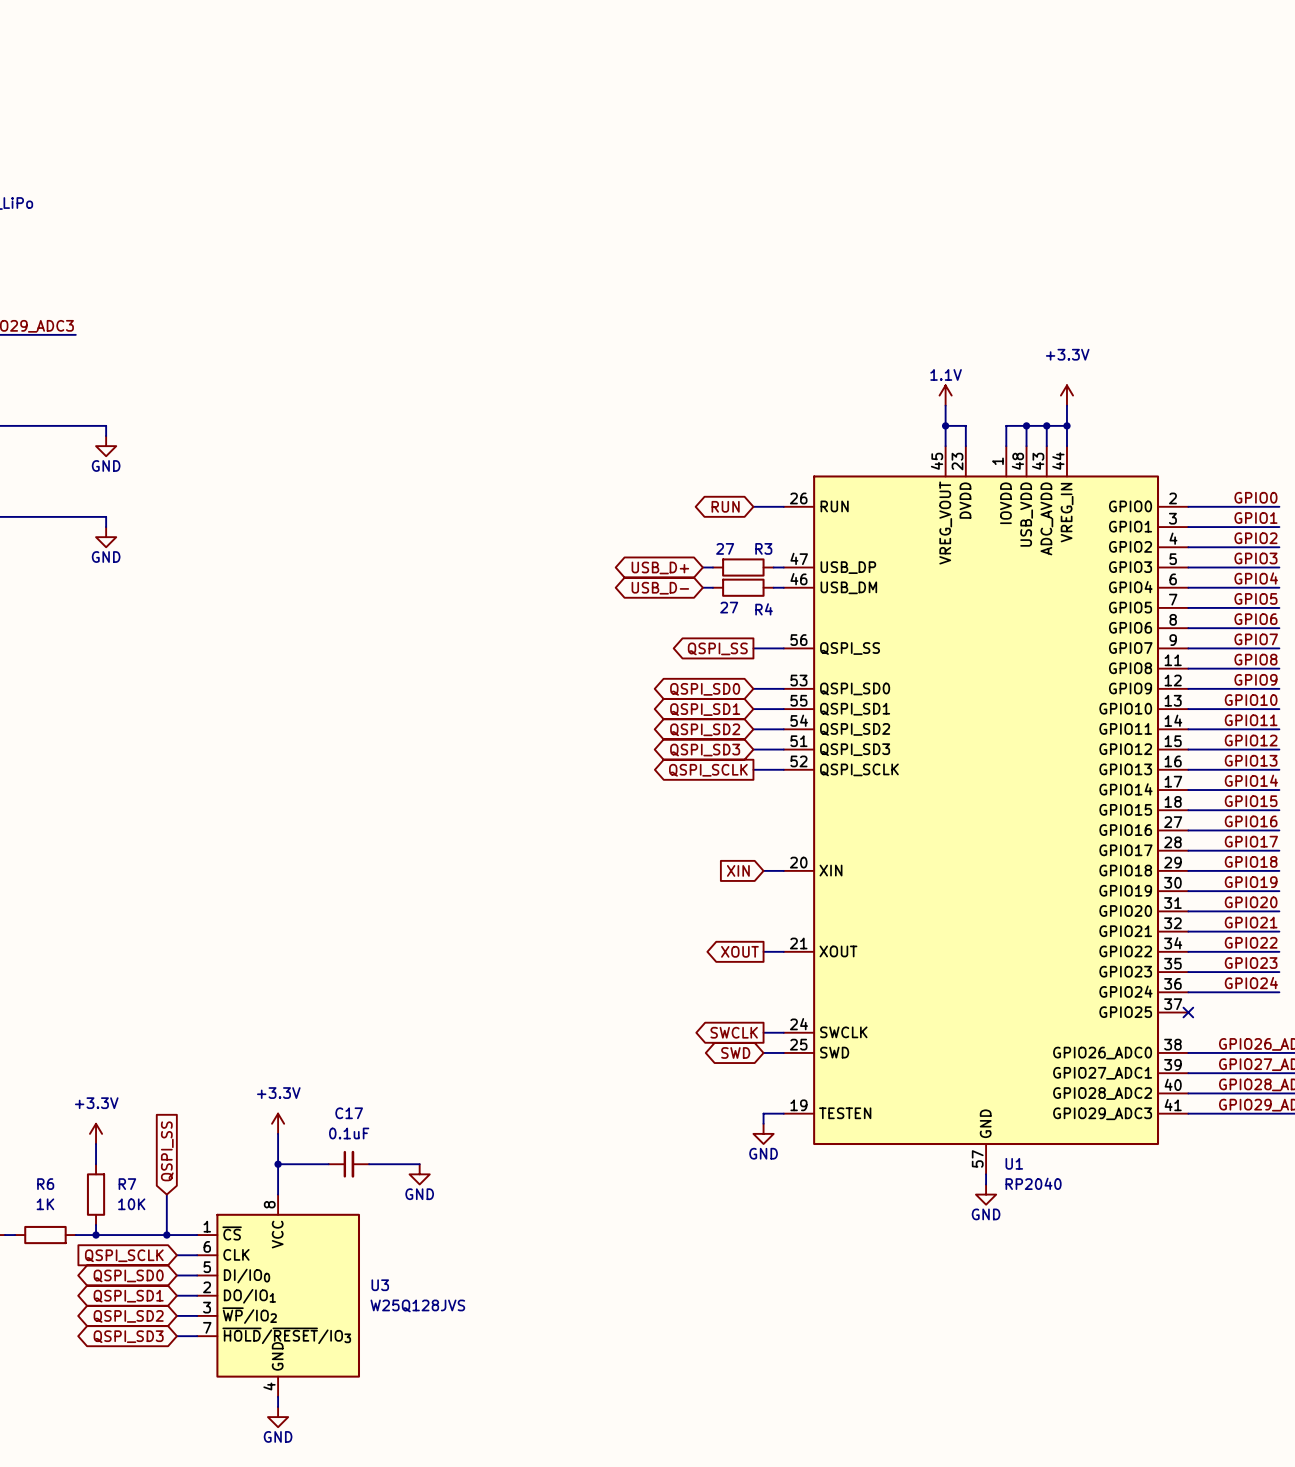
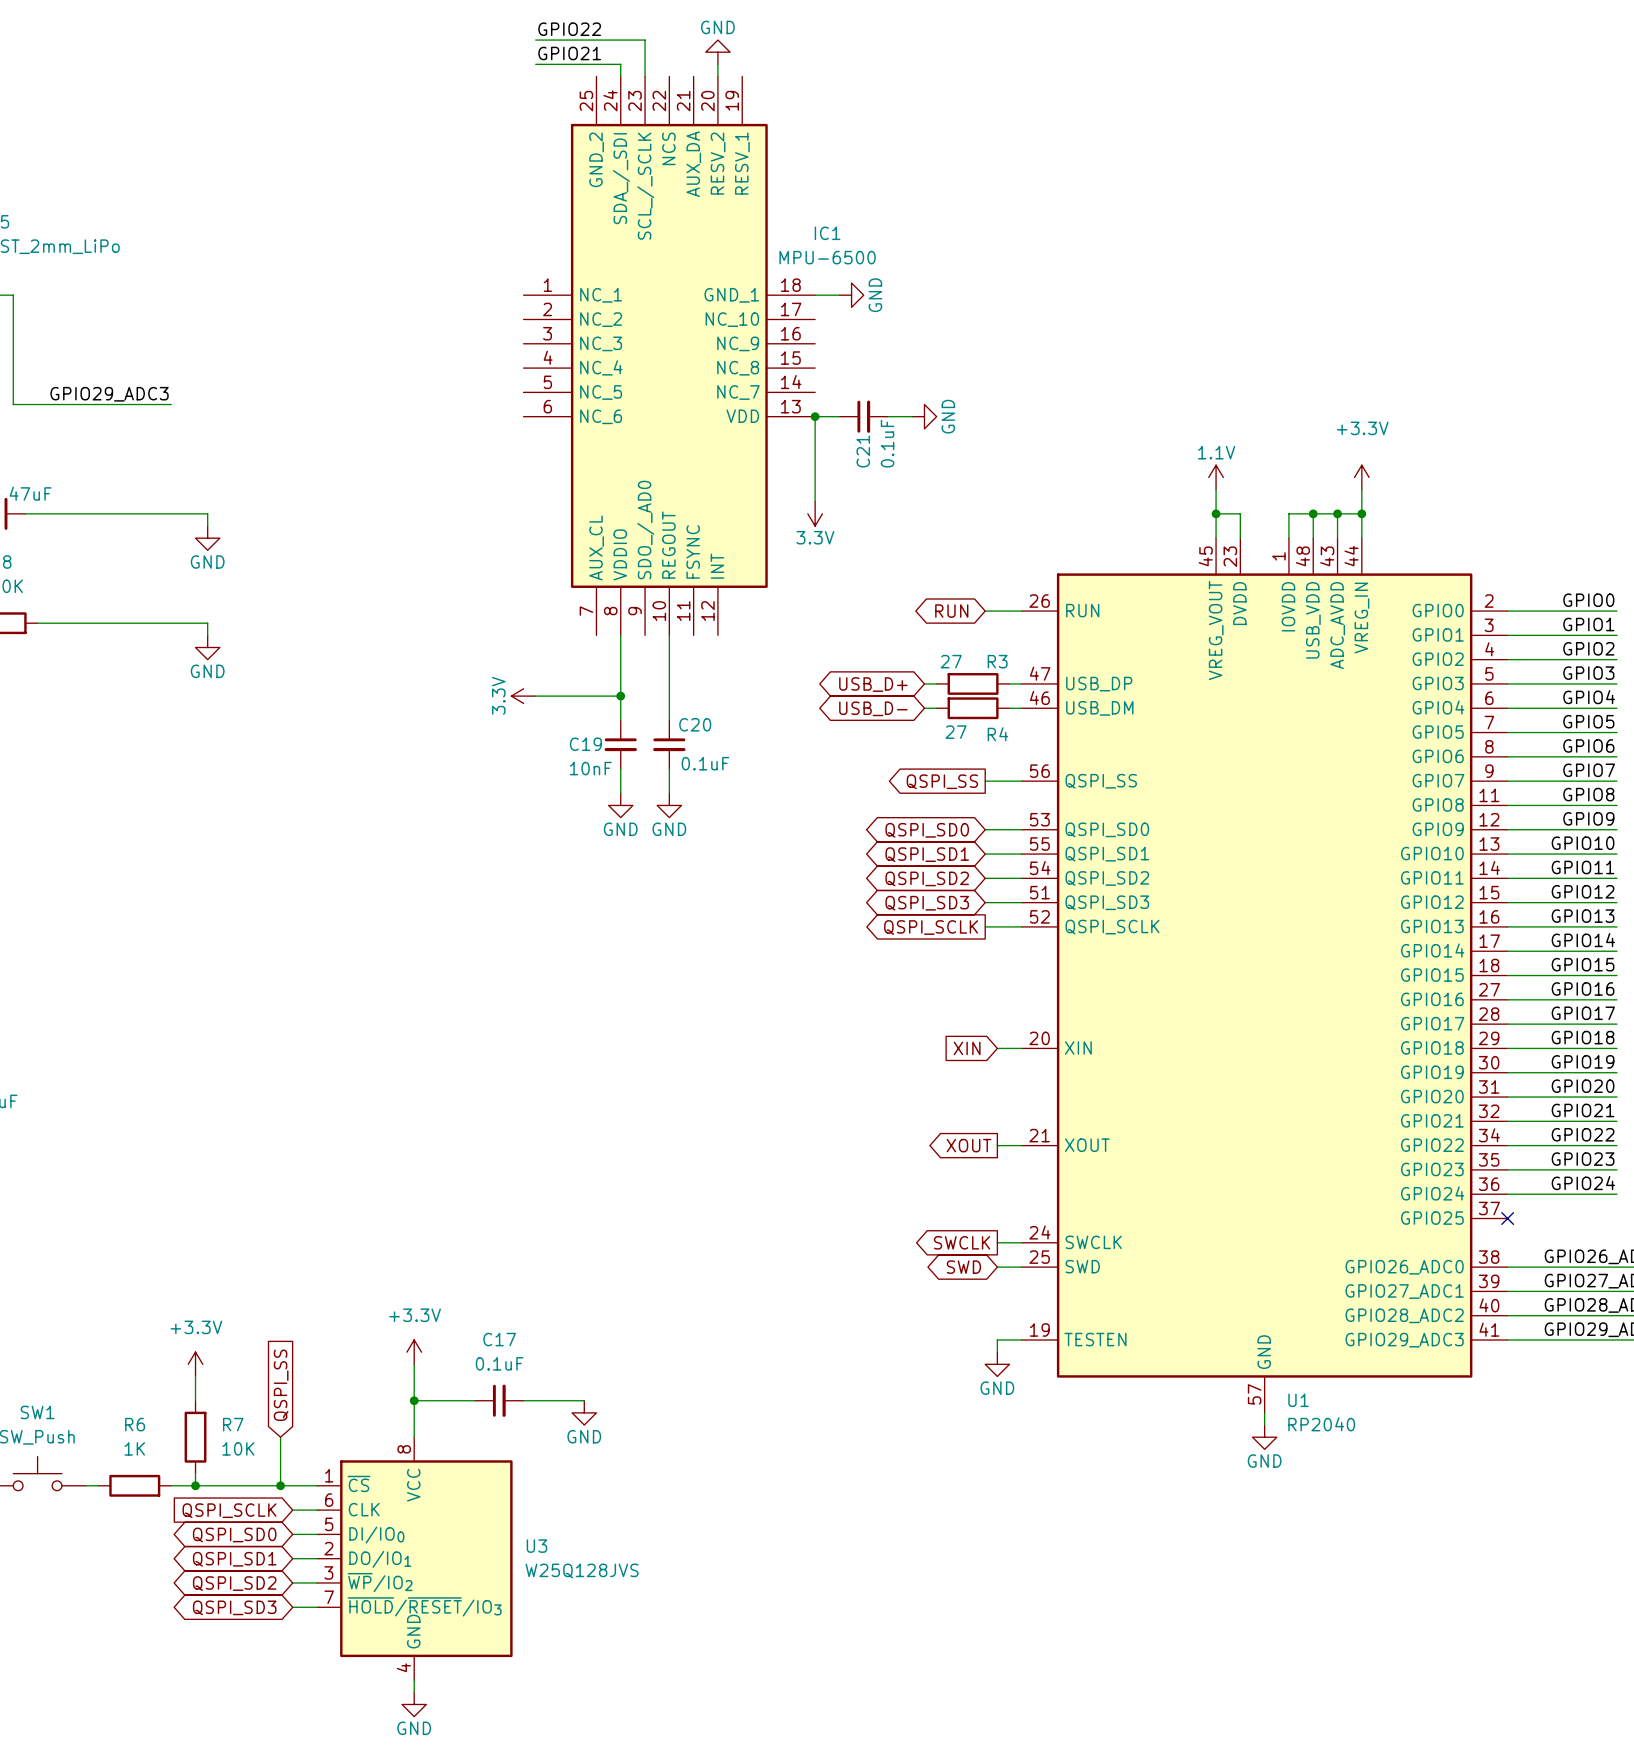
label: none -> GPIO22 (569, 29)
wire: none -> (535, 40) (645, 40) (645, 76)
power symbol: none -> GND (717, 52)
label: none -> GPIO21 (569, 53)
wire: none -> (535, 64) (620, 64) (620, 76)
wire: none -> (717, 64) (717, 76)
wire: none -> (815, 295) (839, 295)
power symbol: none -> GND (851, 295)
IC1: none -> MPU-6500 (669, 355)
junction: none -> (815, 416)
wire: none -> (839, 416) (815, 416) (815, 501)
C21: none -> 0.1uF (863, 416)
wire: none -> (888, 416) (912, 416)
power symbol: none -> GND (924, 416)
power symbol: none -> 3.3V (815, 513)
wire: none -> (620, 635) (620, 720)
wire: none -> (669, 635) (669, 720)
power symbol: none -> 3.3V (523, 696)
wire: none -> (535, 696) (620, 696)
junction: none -> (620, 696)
C19: none -> 10nF (620, 744)
C20: none -> 0.1uF (669, 744)
wire: none -> (620, 768) (620, 793)
wire: none -> (669, 768) (669, 793)
power symbol: none -> GND (620, 805)
power symbol: none -> GND (669, 805)

